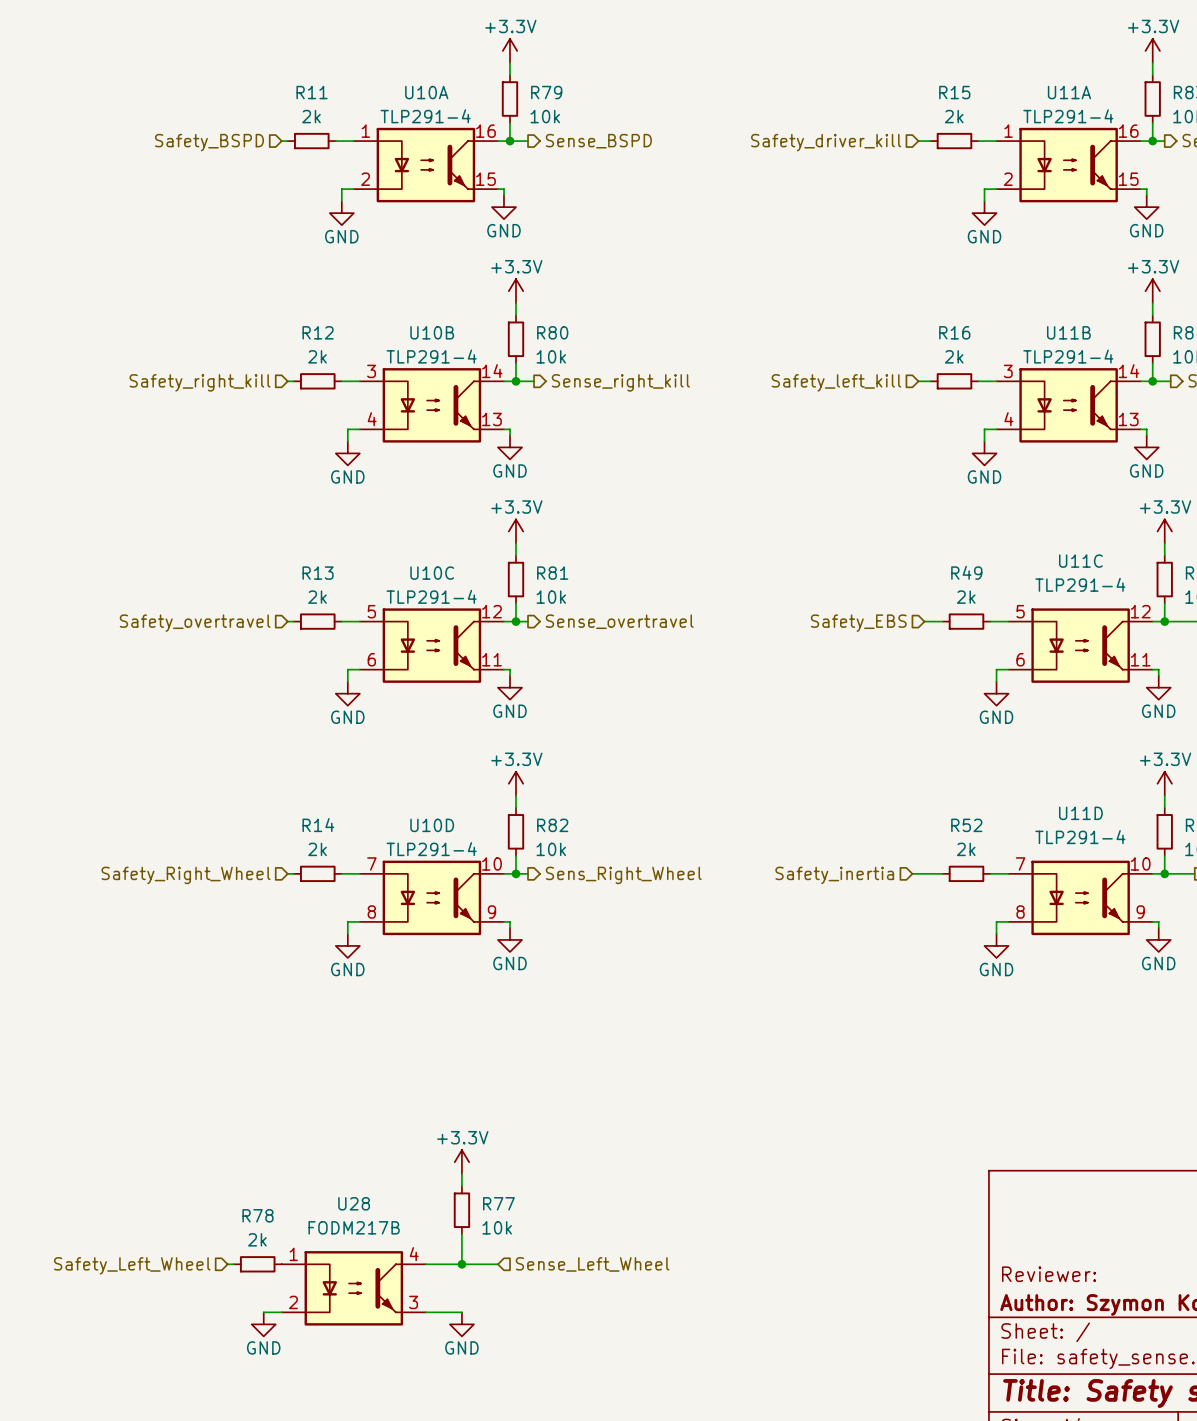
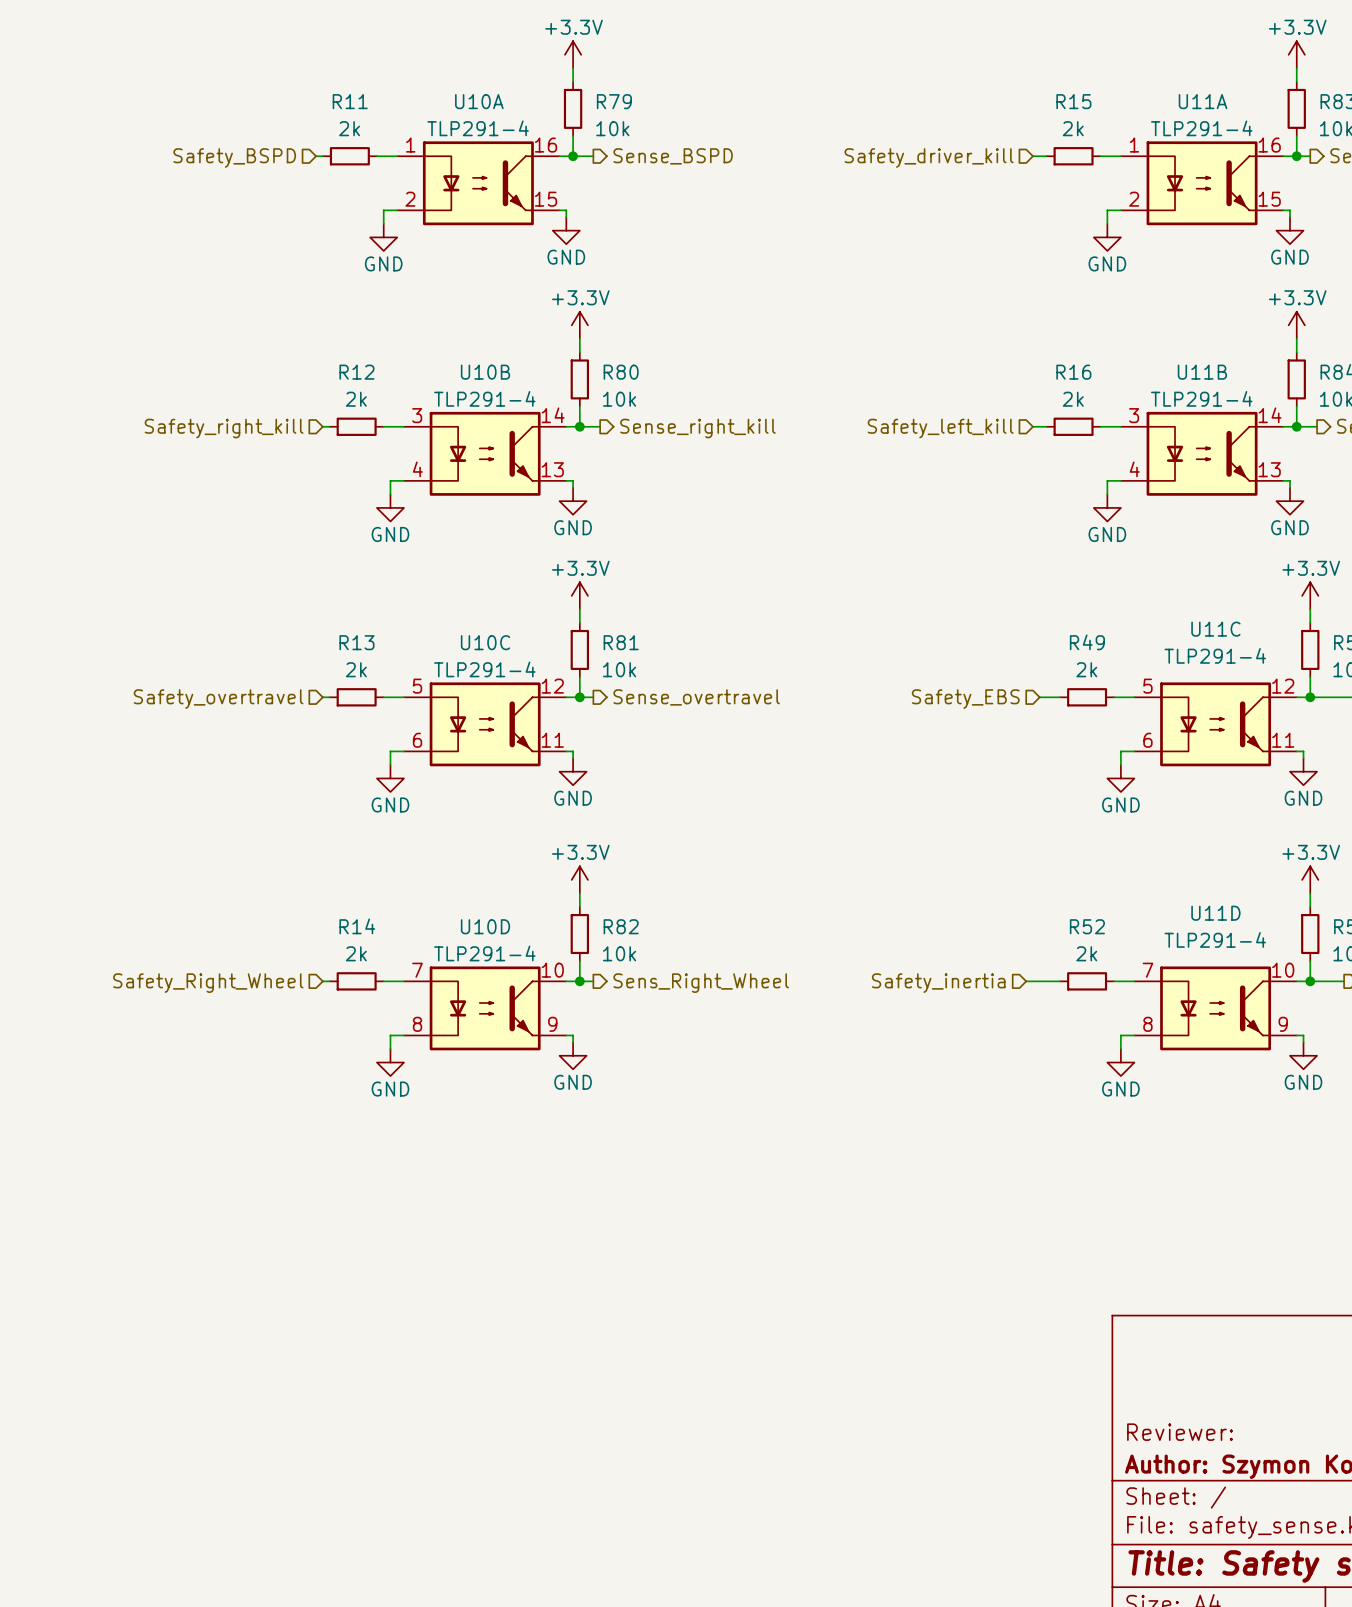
power symbol: +3.3V (461, 1162) -> none
wire: (461, 1174) (461, 1186) -> none
R77: 10k (461, 1210) -> none
wire: (461, 1234) (461, 1264) -> none
wire: (227, 1264) (233, 1264) -> none
R78: 2k (257, 1264) -> none
wire: (425, 1264) (497, 1264) -> none
junction: (461, 1264) -> none
hierarchical label: Sense_Left_Wheel (592, 1264) -> none
hierarchical label: Safety_Left_Wheel (132, 1265) -> none
U28: FODM217B (353, 1288) -> none
wire: (263, 1312) (281, 1312) -> none
wire: (425, 1312) (461, 1312) -> none
power symbol: GND (263, 1324) -> none
power symbol: GND (461, 1324) -> none

